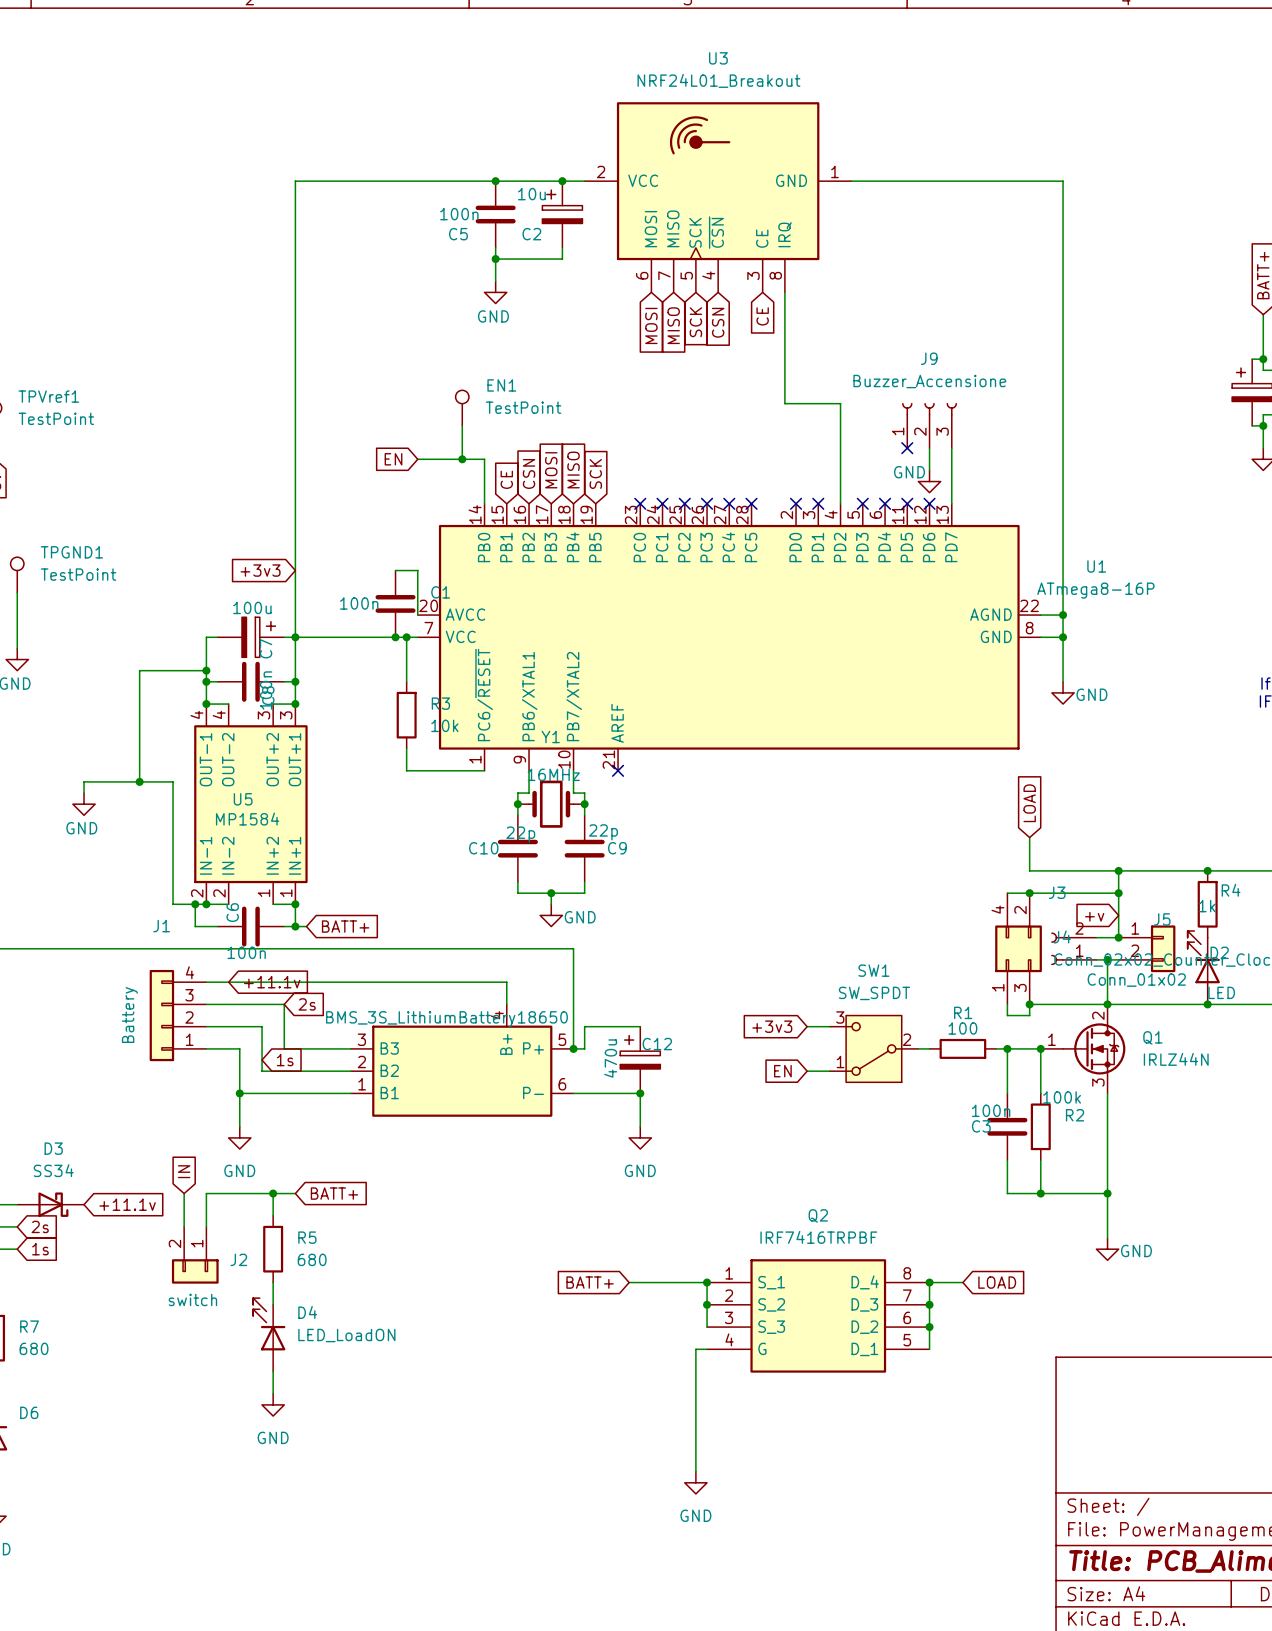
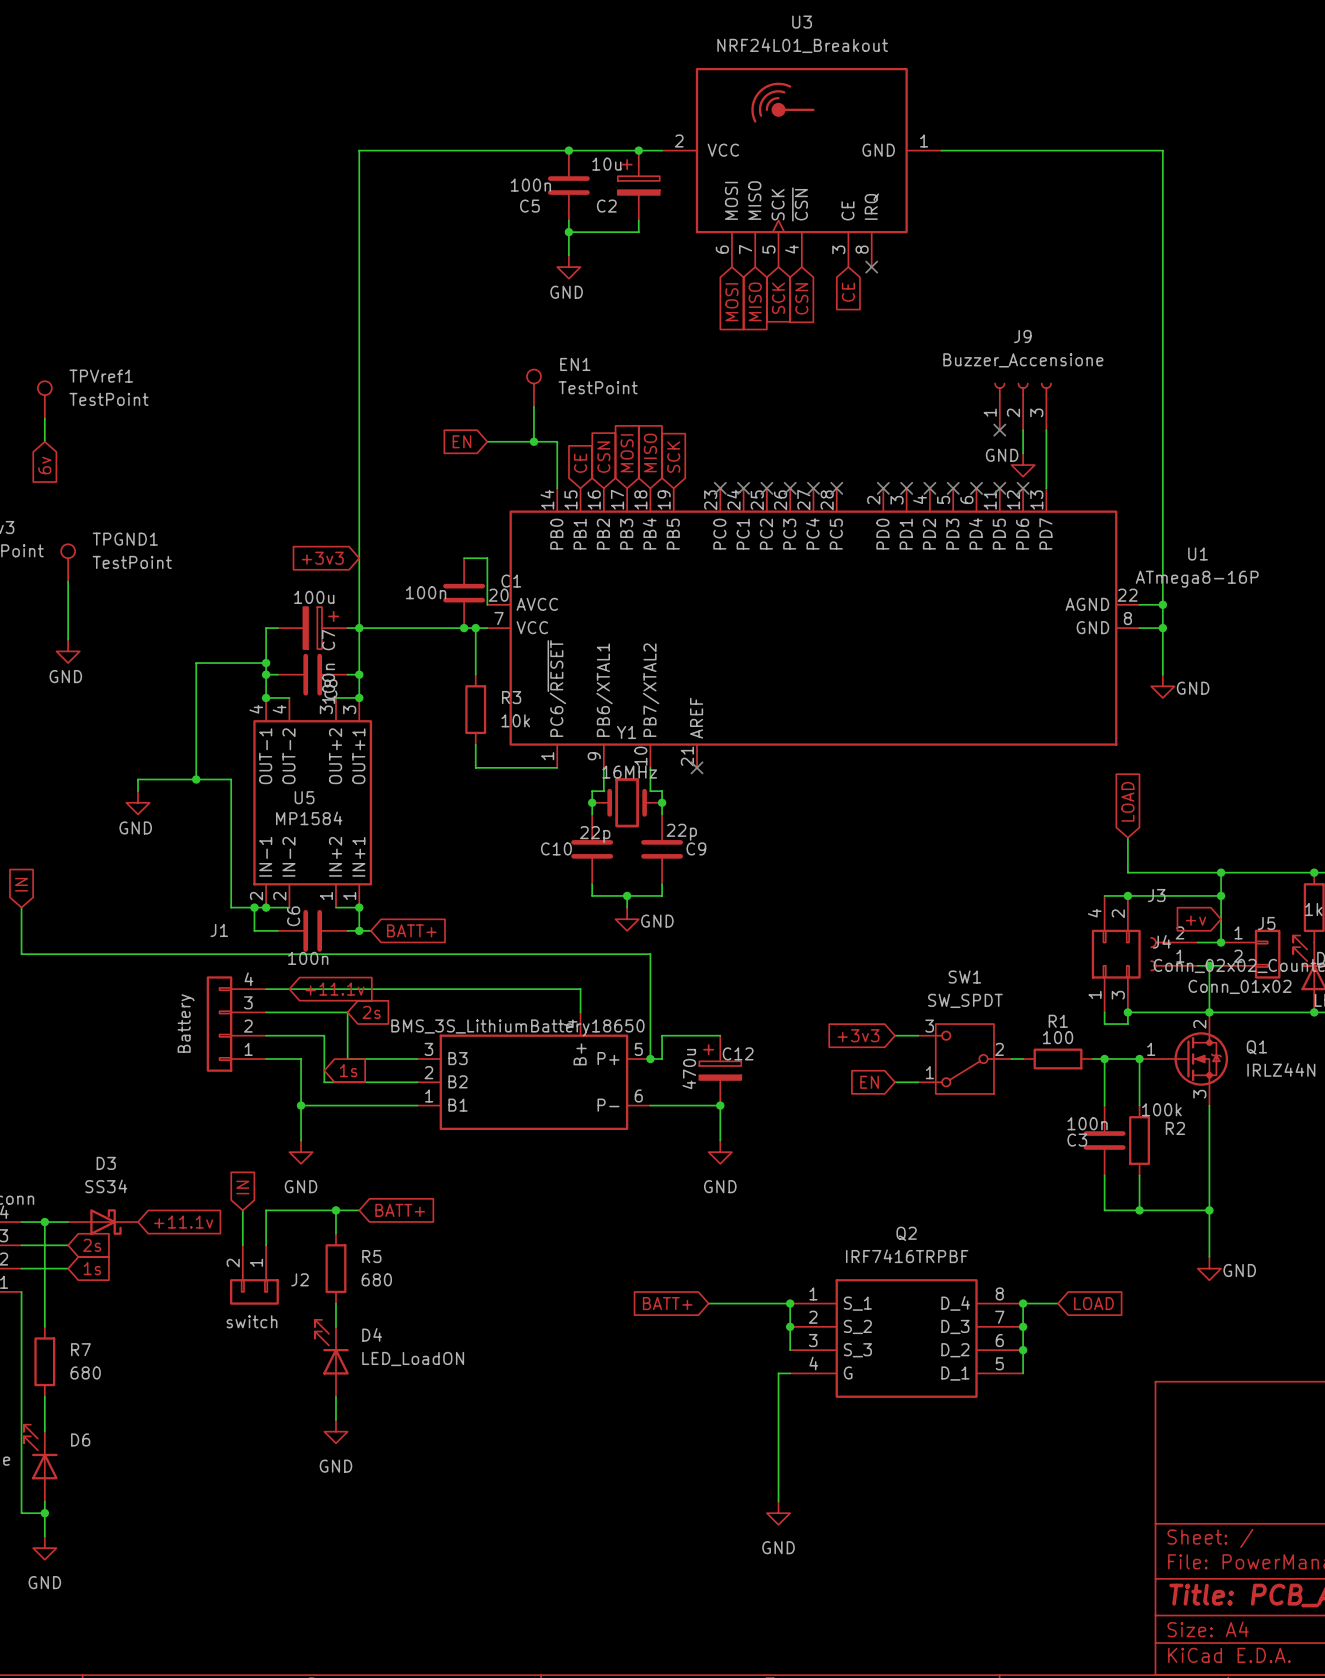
wire: (784, 292) (784, 403) (840, 403) (840, 503) -> none
no-connect mark: none -> (871, 267)
no-connect mark: none -> (929, 488)

